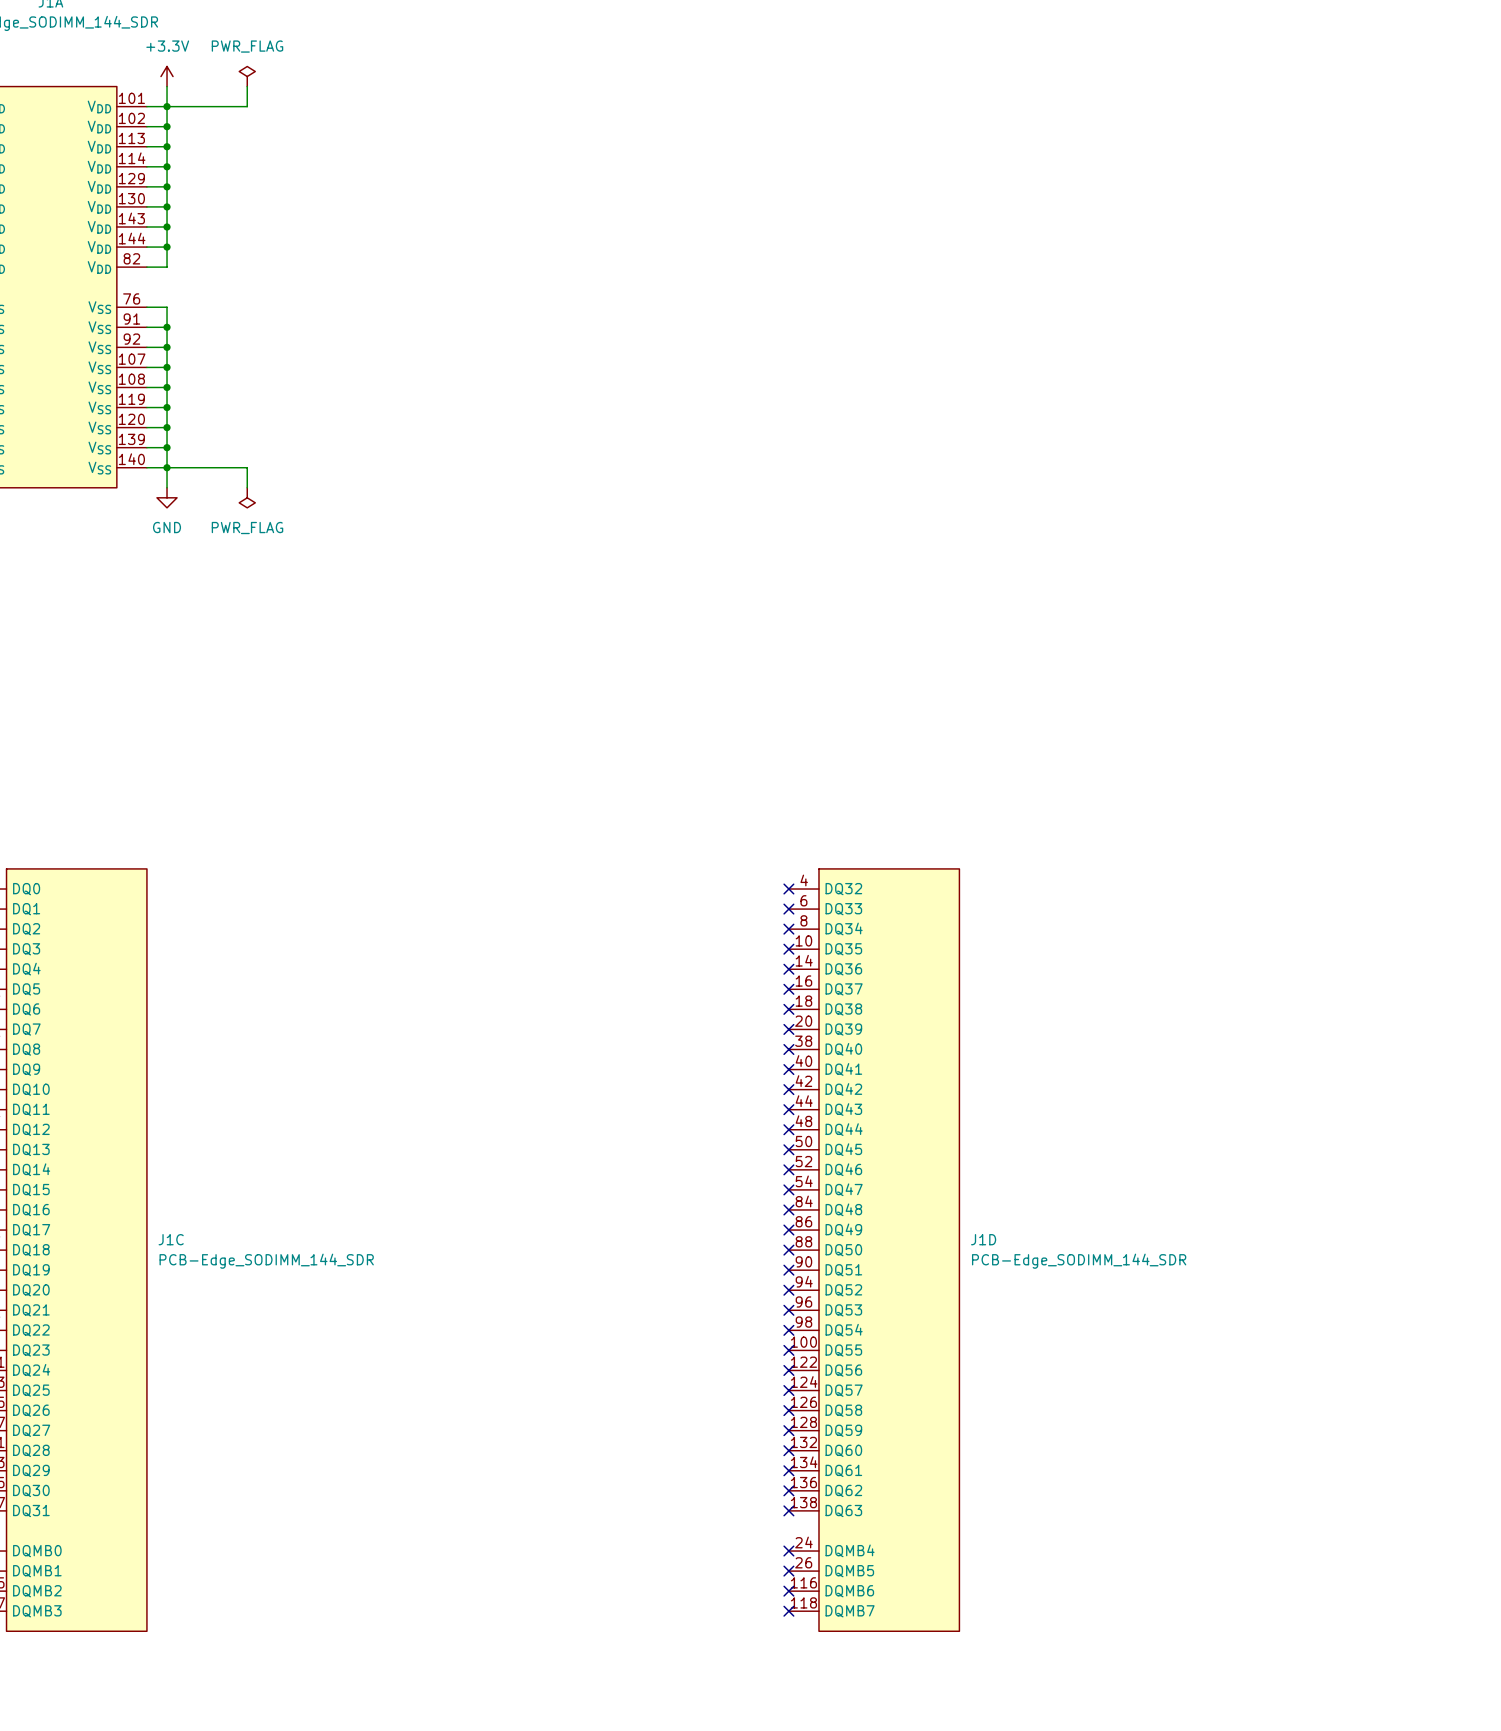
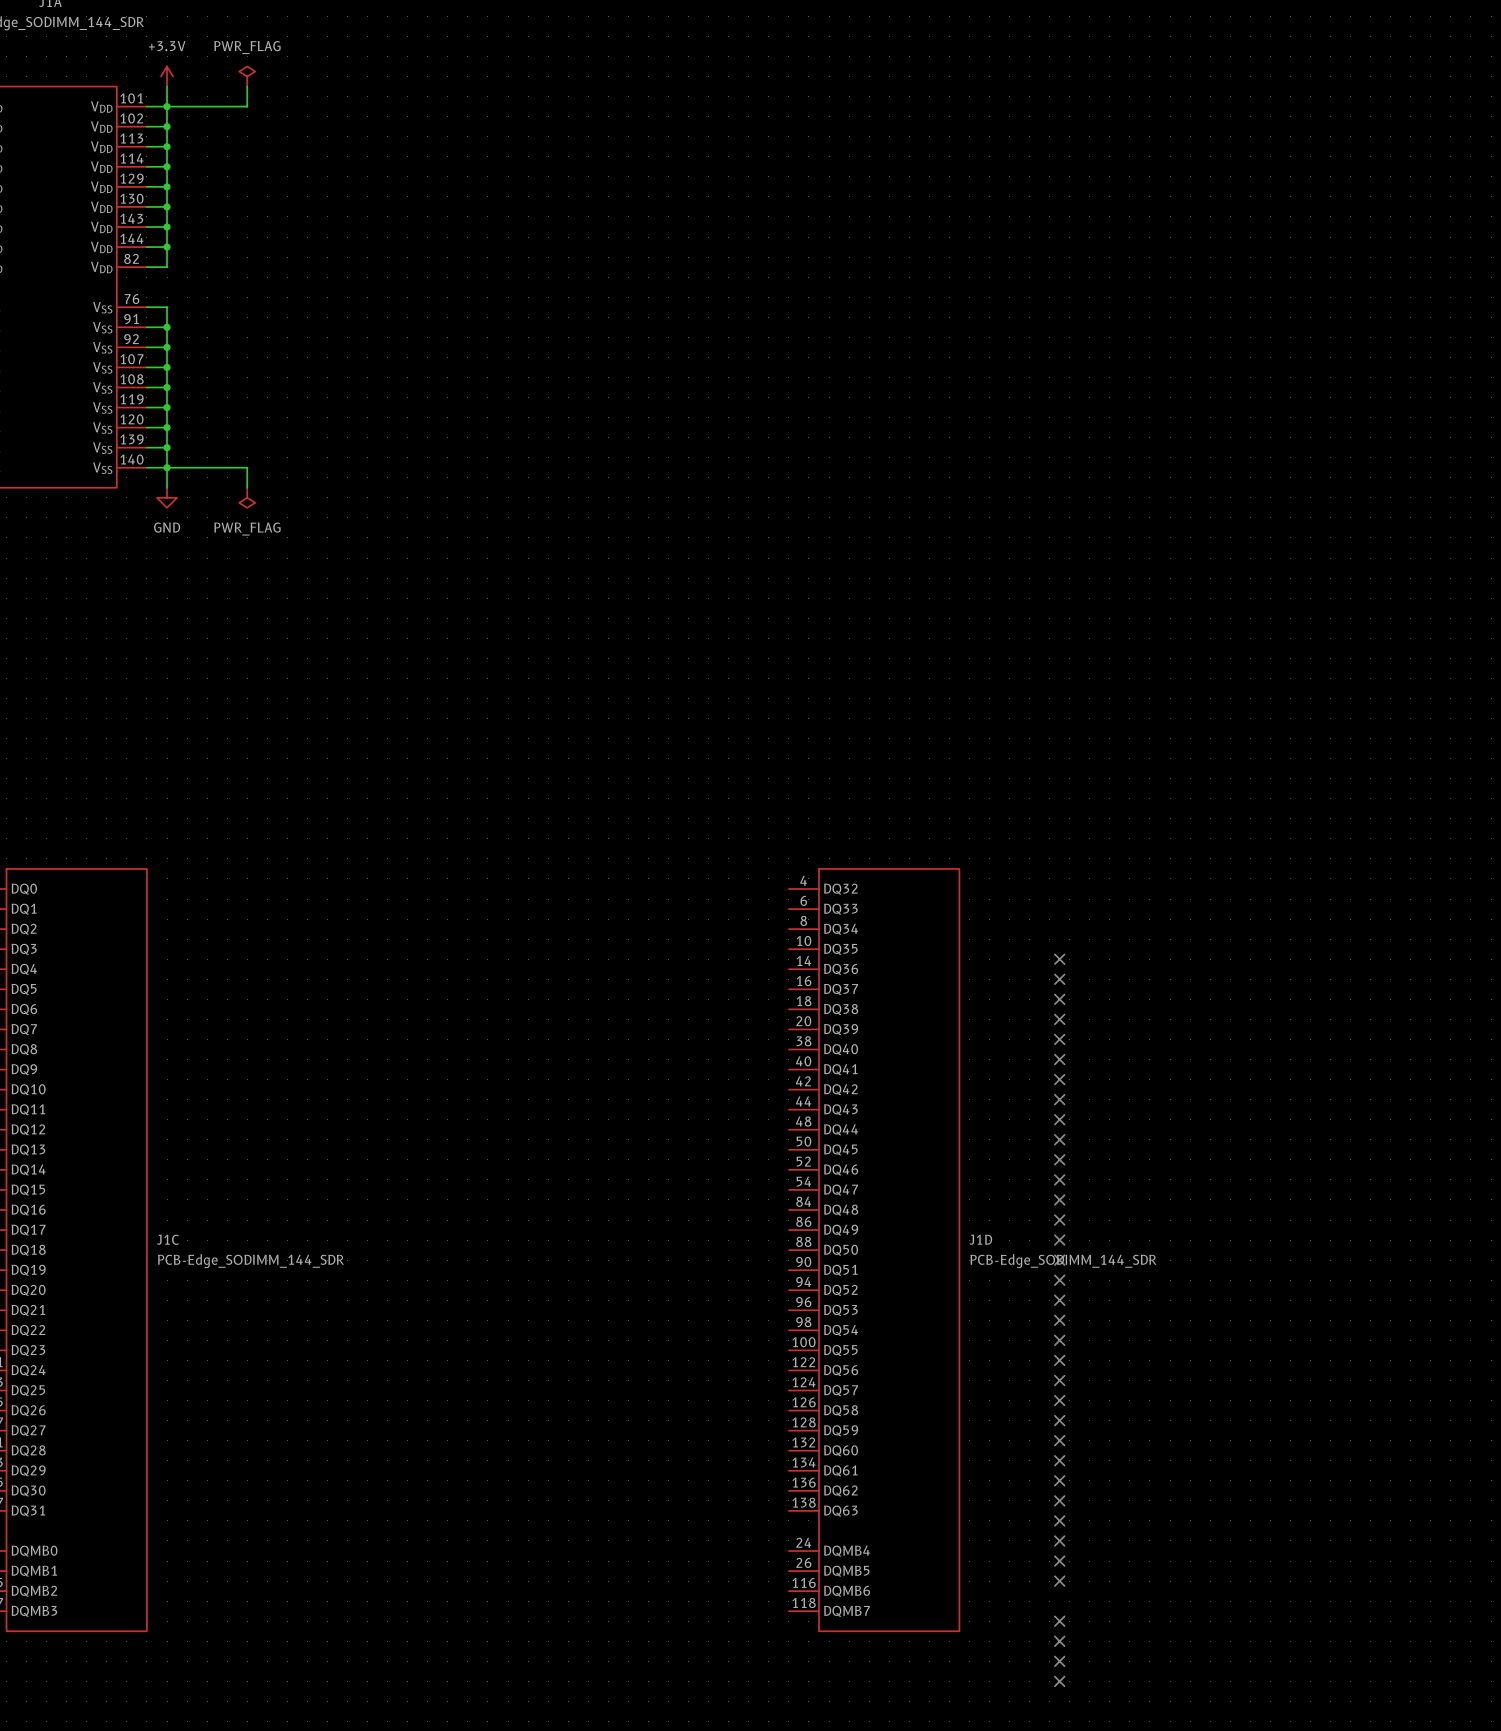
no-connect mark: (788, 889) -> none
no-connect mark: (788, 909) -> none
no-connect mark: (788, 929) -> none
no-connect mark: (788, 949) -> none
no-connect mark: none -> (1059, 959)
no-connect mark: (788, 969) -> none
no-connect mark: none -> (1059, 979)
no-connect mark: (788, 989) -> none
no-connect mark: none -> (1059, 999)
no-connect mark: (788, 1009) -> none
no-connect mark: none -> (1059, 1019)
no-connect mark: (788, 1029) -> none
no-connect mark: none -> (1059, 1039)
no-connect mark: (788, 1049) -> none
no-connect mark: none -> (1059, 1059)
no-connect mark: (788, 1069) -> none
no-connect mark: none -> (1059, 1079)
no-connect mark: (788, 1089) -> none
no-connect mark: none -> (1059, 1099)
no-connect mark: (788, 1109) -> none
no-connect mark: none -> (1059, 1119)
no-connect mark: (788, 1129) -> none
no-connect mark: none -> (1059, 1139)
no-connect mark: (788, 1149) -> none
no-connect mark: none -> (1059, 1159)
no-connect mark: (788, 1169) -> none
no-connect mark: none -> (1059, 1179)
no-connect mark: (788, 1189) -> none
no-connect mark: none -> (1059, 1199)
no-connect mark: (788, 1209) -> none
no-connect mark: none -> (1059, 1220)
no-connect mark: (788, 1230) -> none
no-connect mark: none -> (1059, 1240)
no-connect mark: (788, 1250) -> none
no-connect mark: none -> (1059, 1260)
no-connect mark: (788, 1270) -> none
no-connect mark: none -> (1059, 1280)
no-connect mark: (788, 1290) -> none
no-connect mark: none -> (1059, 1300)
no-connect mark: (788, 1310) -> none
no-connect mark: none -> (1059, 1320)
no-connect mark: (788, 1330) -> none
no-connect mark: none -> (1059, 1340)
no-connect mark: (788, 1350) -> none
no-connect mark: none -> (1059, 1360)
no-connect mark: (788, 1370) -> none
no-connect mark: none -> (1059, 1380)
no-connect mark: (788, 1390) -> none
no-connect mark: none -> (1059, 1400)
no-connect mark: (788, 1410) -> none
no-connect mark: none -> (1059, 1420)
no-connect mark: (788, 1430) -> none
no-connect mark: none -> (1059, 1440)
no-connect mark: (788, 1450) -> none
no-connect mark: none -> (1059, 1460)
no-connect mark: (788, 1470) -> none
no-connect mark: none -> (1059, 1480)
no-connect mark: (788, 1490) -> none
no-connect mark: none -> (1059, 1500)
no-connect mark: (788, 1510) -> none
no-connect mark: none -> (1059, 1520)
no-connect mark: none -> (1059, 1540)
no-connect mark: (788, 1551) -> none
no-connect mark: none -> (1059, 1561)
no-connect mark: (788, 1571) -> none
no-connect mark: none -> (1059, 1581)
no-connect mark: (788, 1591) -> none
no-connect mark: (788, 1611) -> none
no-connect mark: none -> (1059, 1621)
no-connect mark: none -> (1059, 1641)
no-connect mark: none -> (1059, 1661)
no-connect mark: none -> (1059, 1681)

